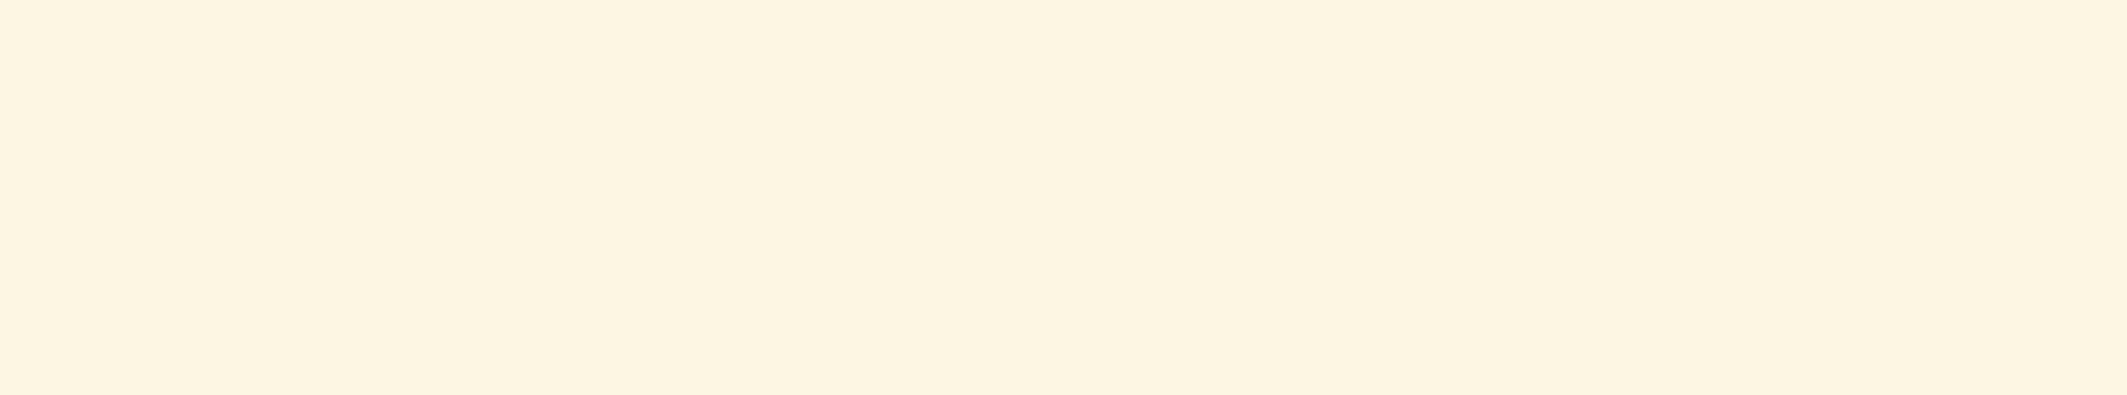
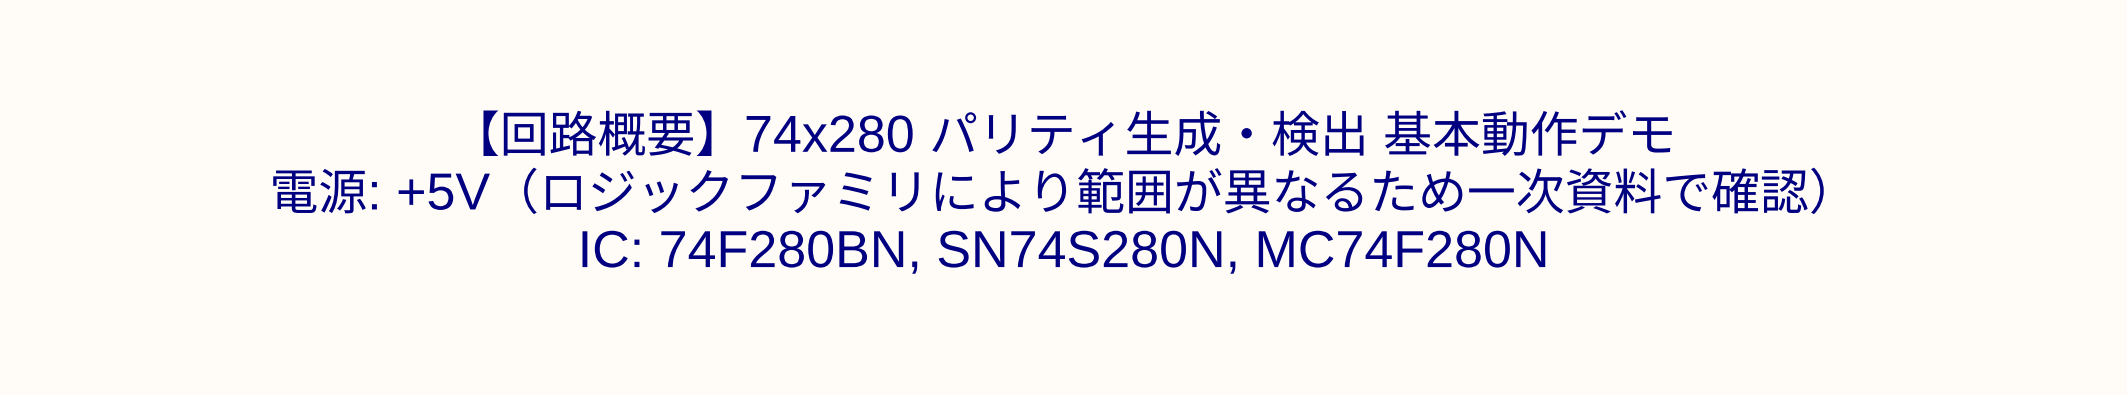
text: none -> 【回路概要】74x280 パリティ生成・検出 基本動作デモ (1077, 133)
text: none -> 電源: +5V（ロジックファミリにより範囲が異なるため一次資料で確認） (1048, 190)
text: none -> IC: 74F280BN, SN74S280N, MC74F280N (1063, 252)

